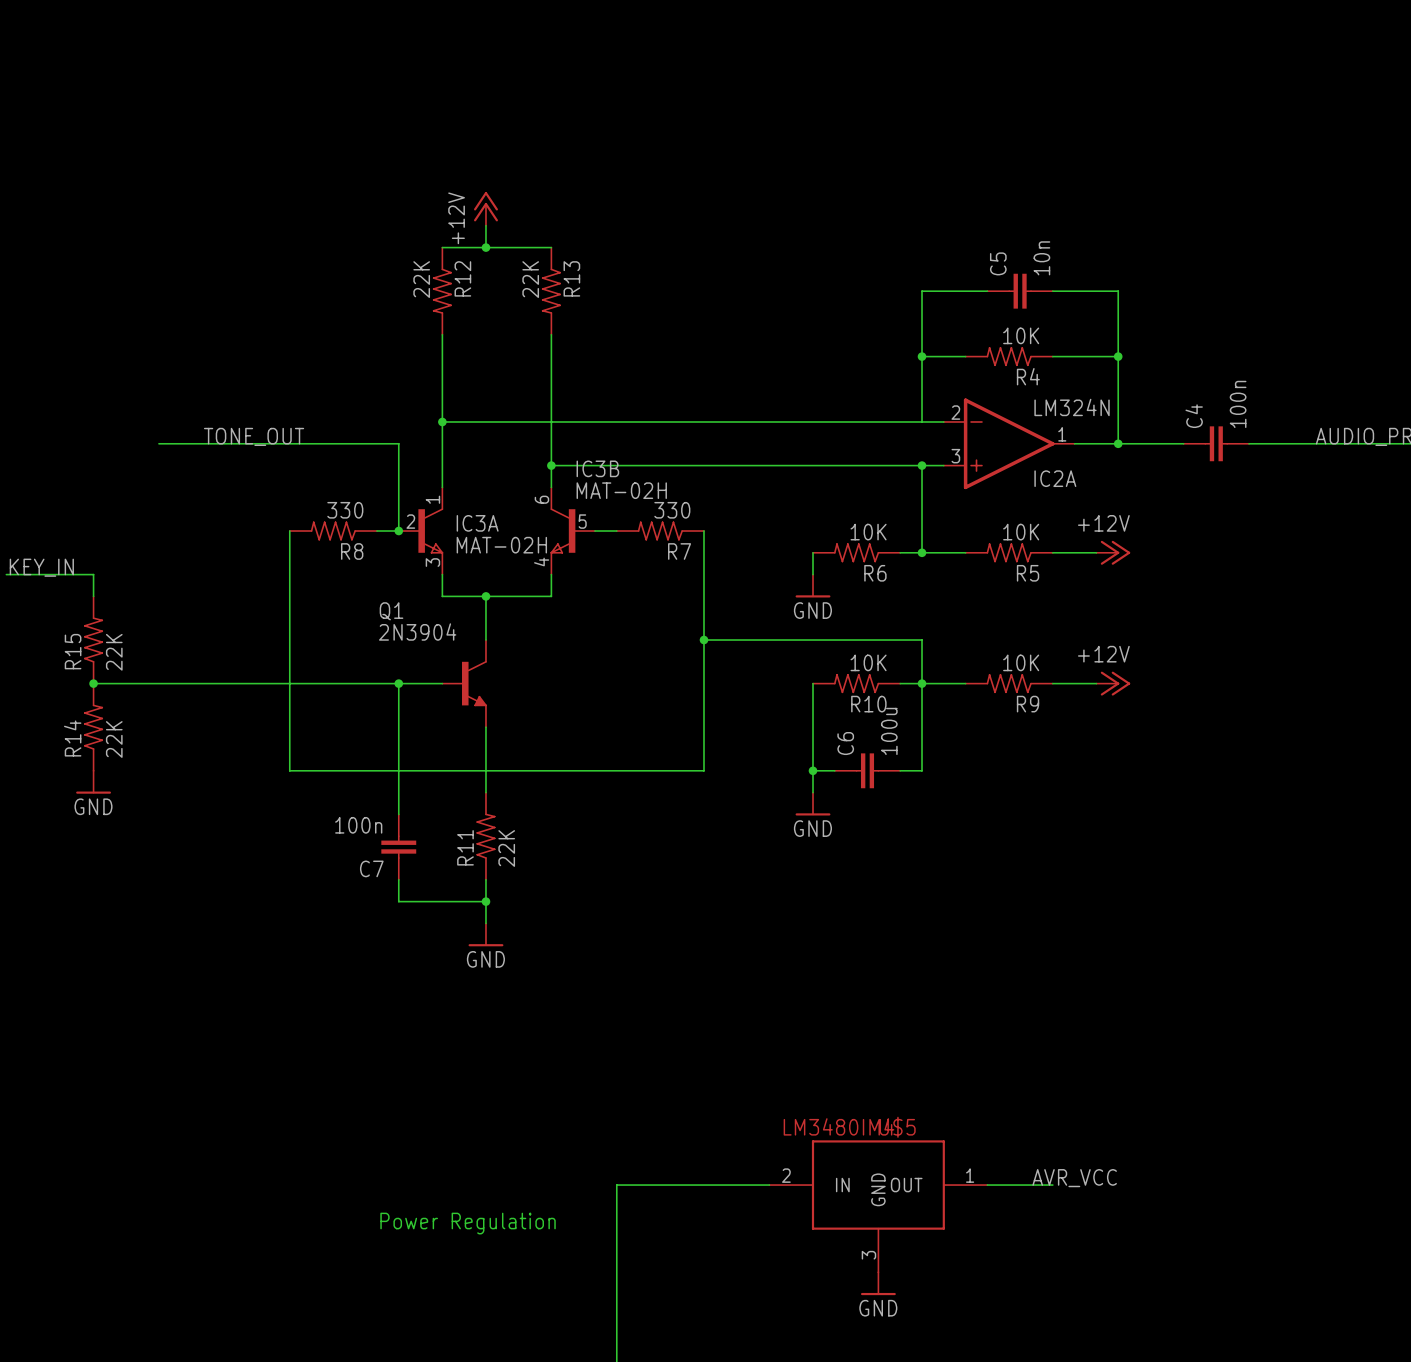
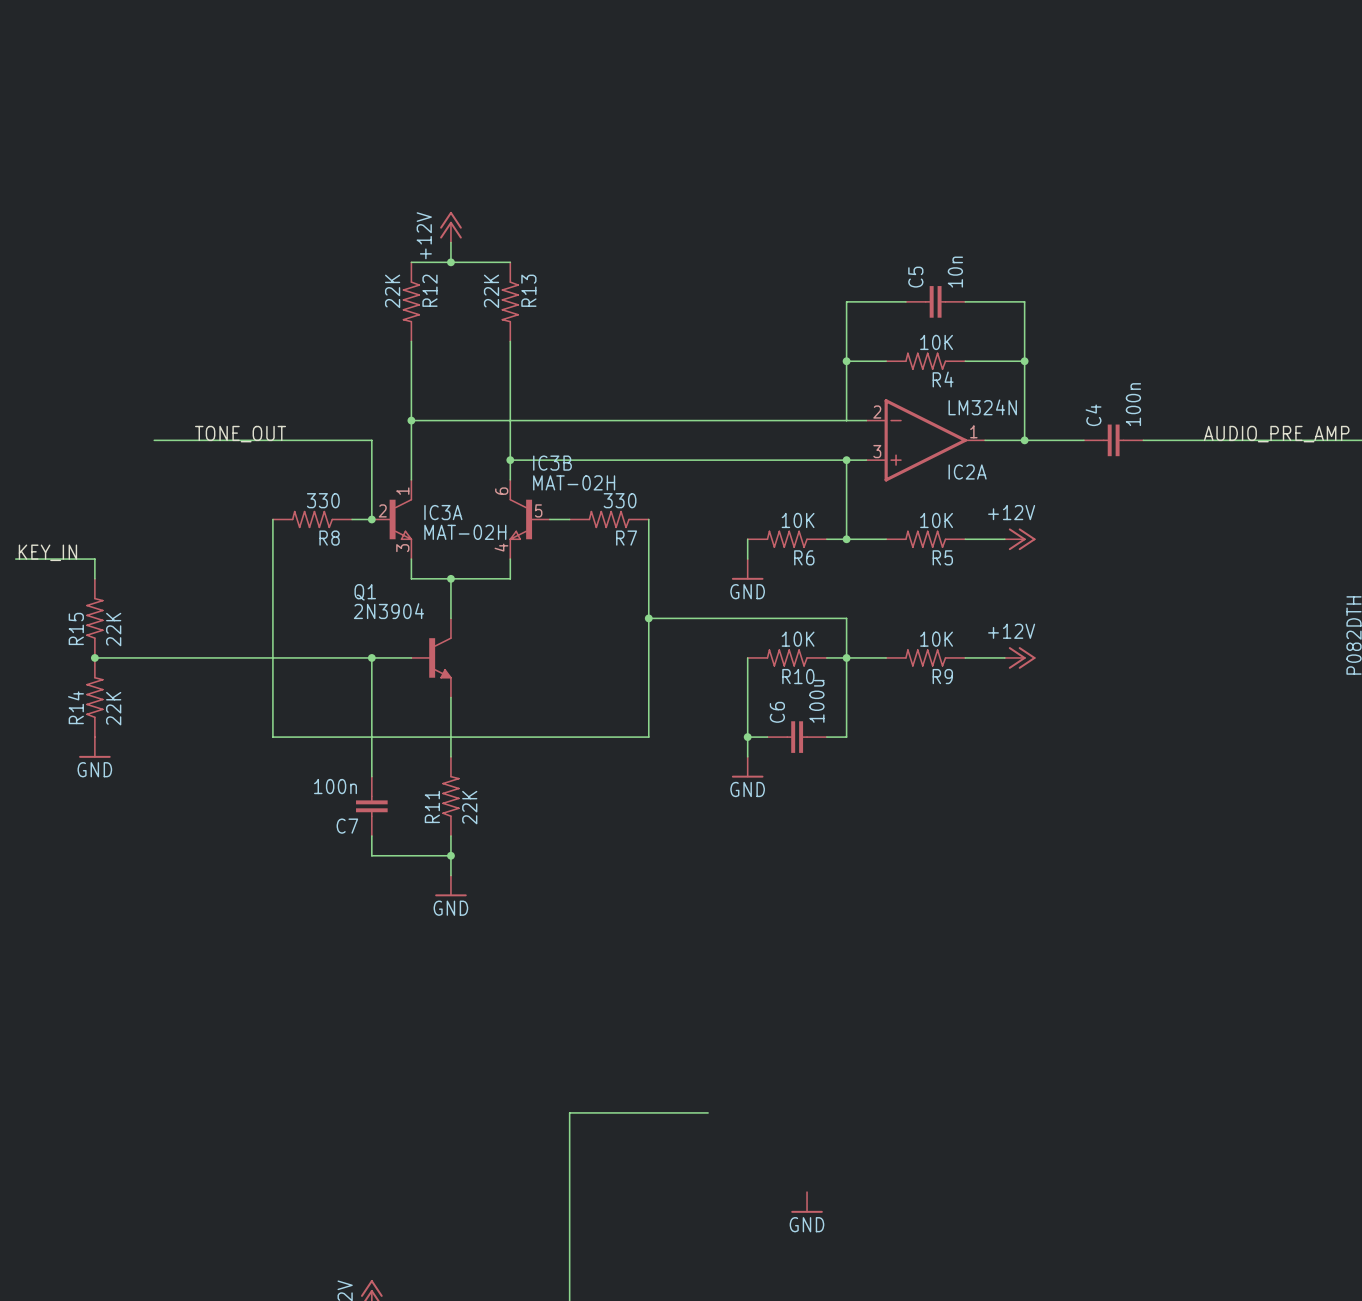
label: AVR_VCC (1074, 1178) -> none
wire: (987, 1185) (1052, 1185) -> none
U$5: LM3480IM4 (878, 1206) -> none
text: Power Regulation (468, 1223) -> none

